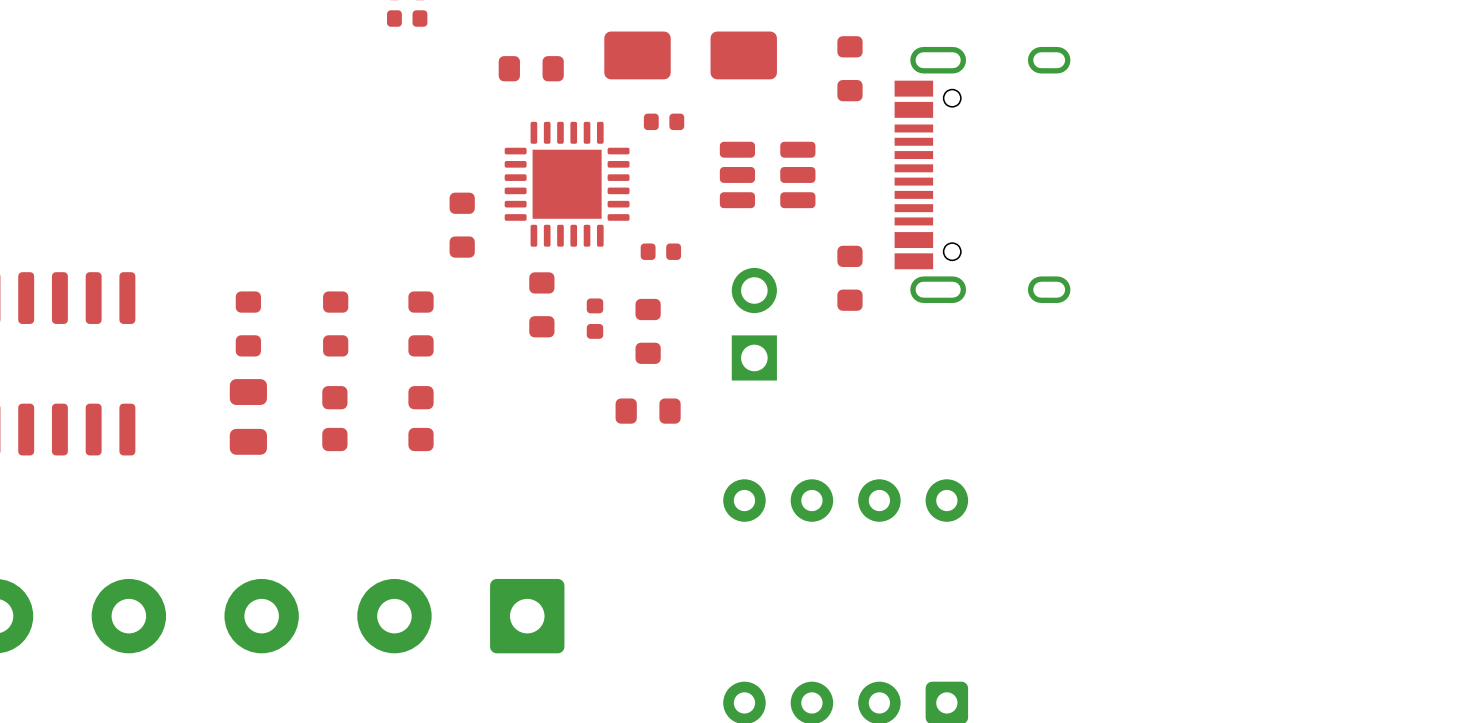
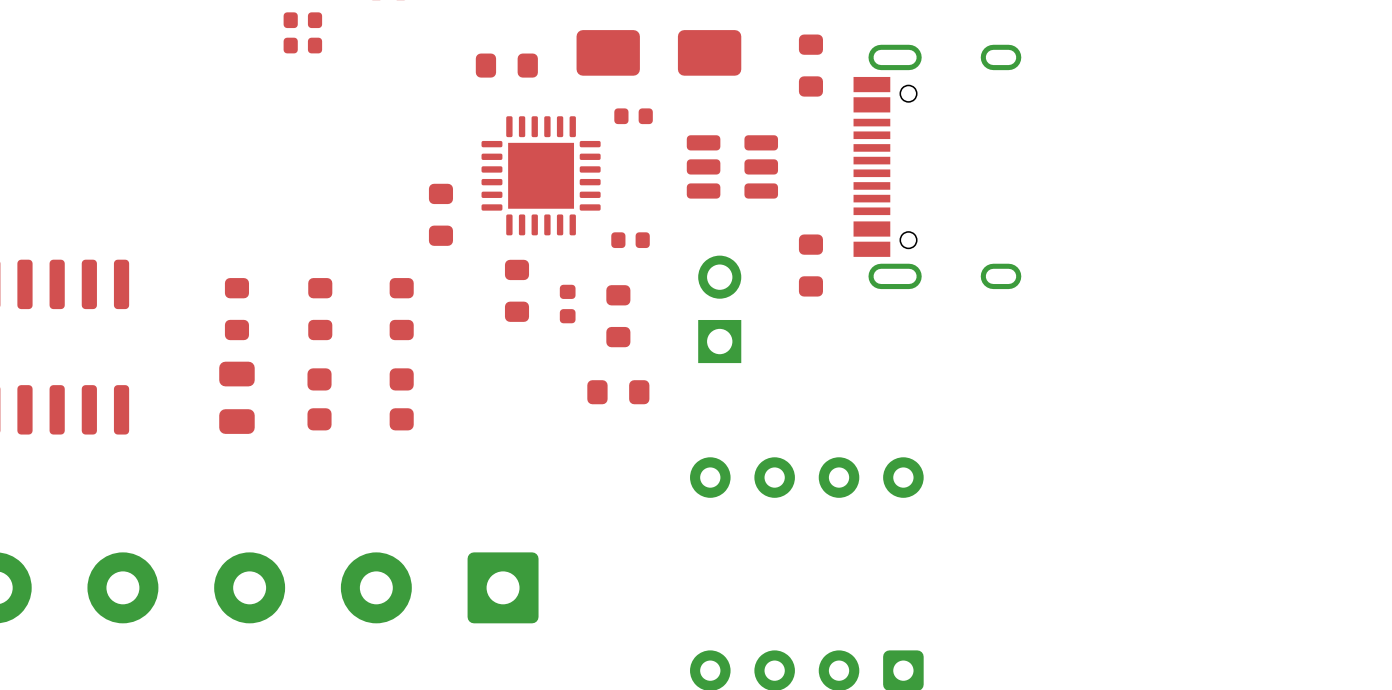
part: (407, 18) -> none
part: none -> (302, 20)
part: none -> (302, 45)

